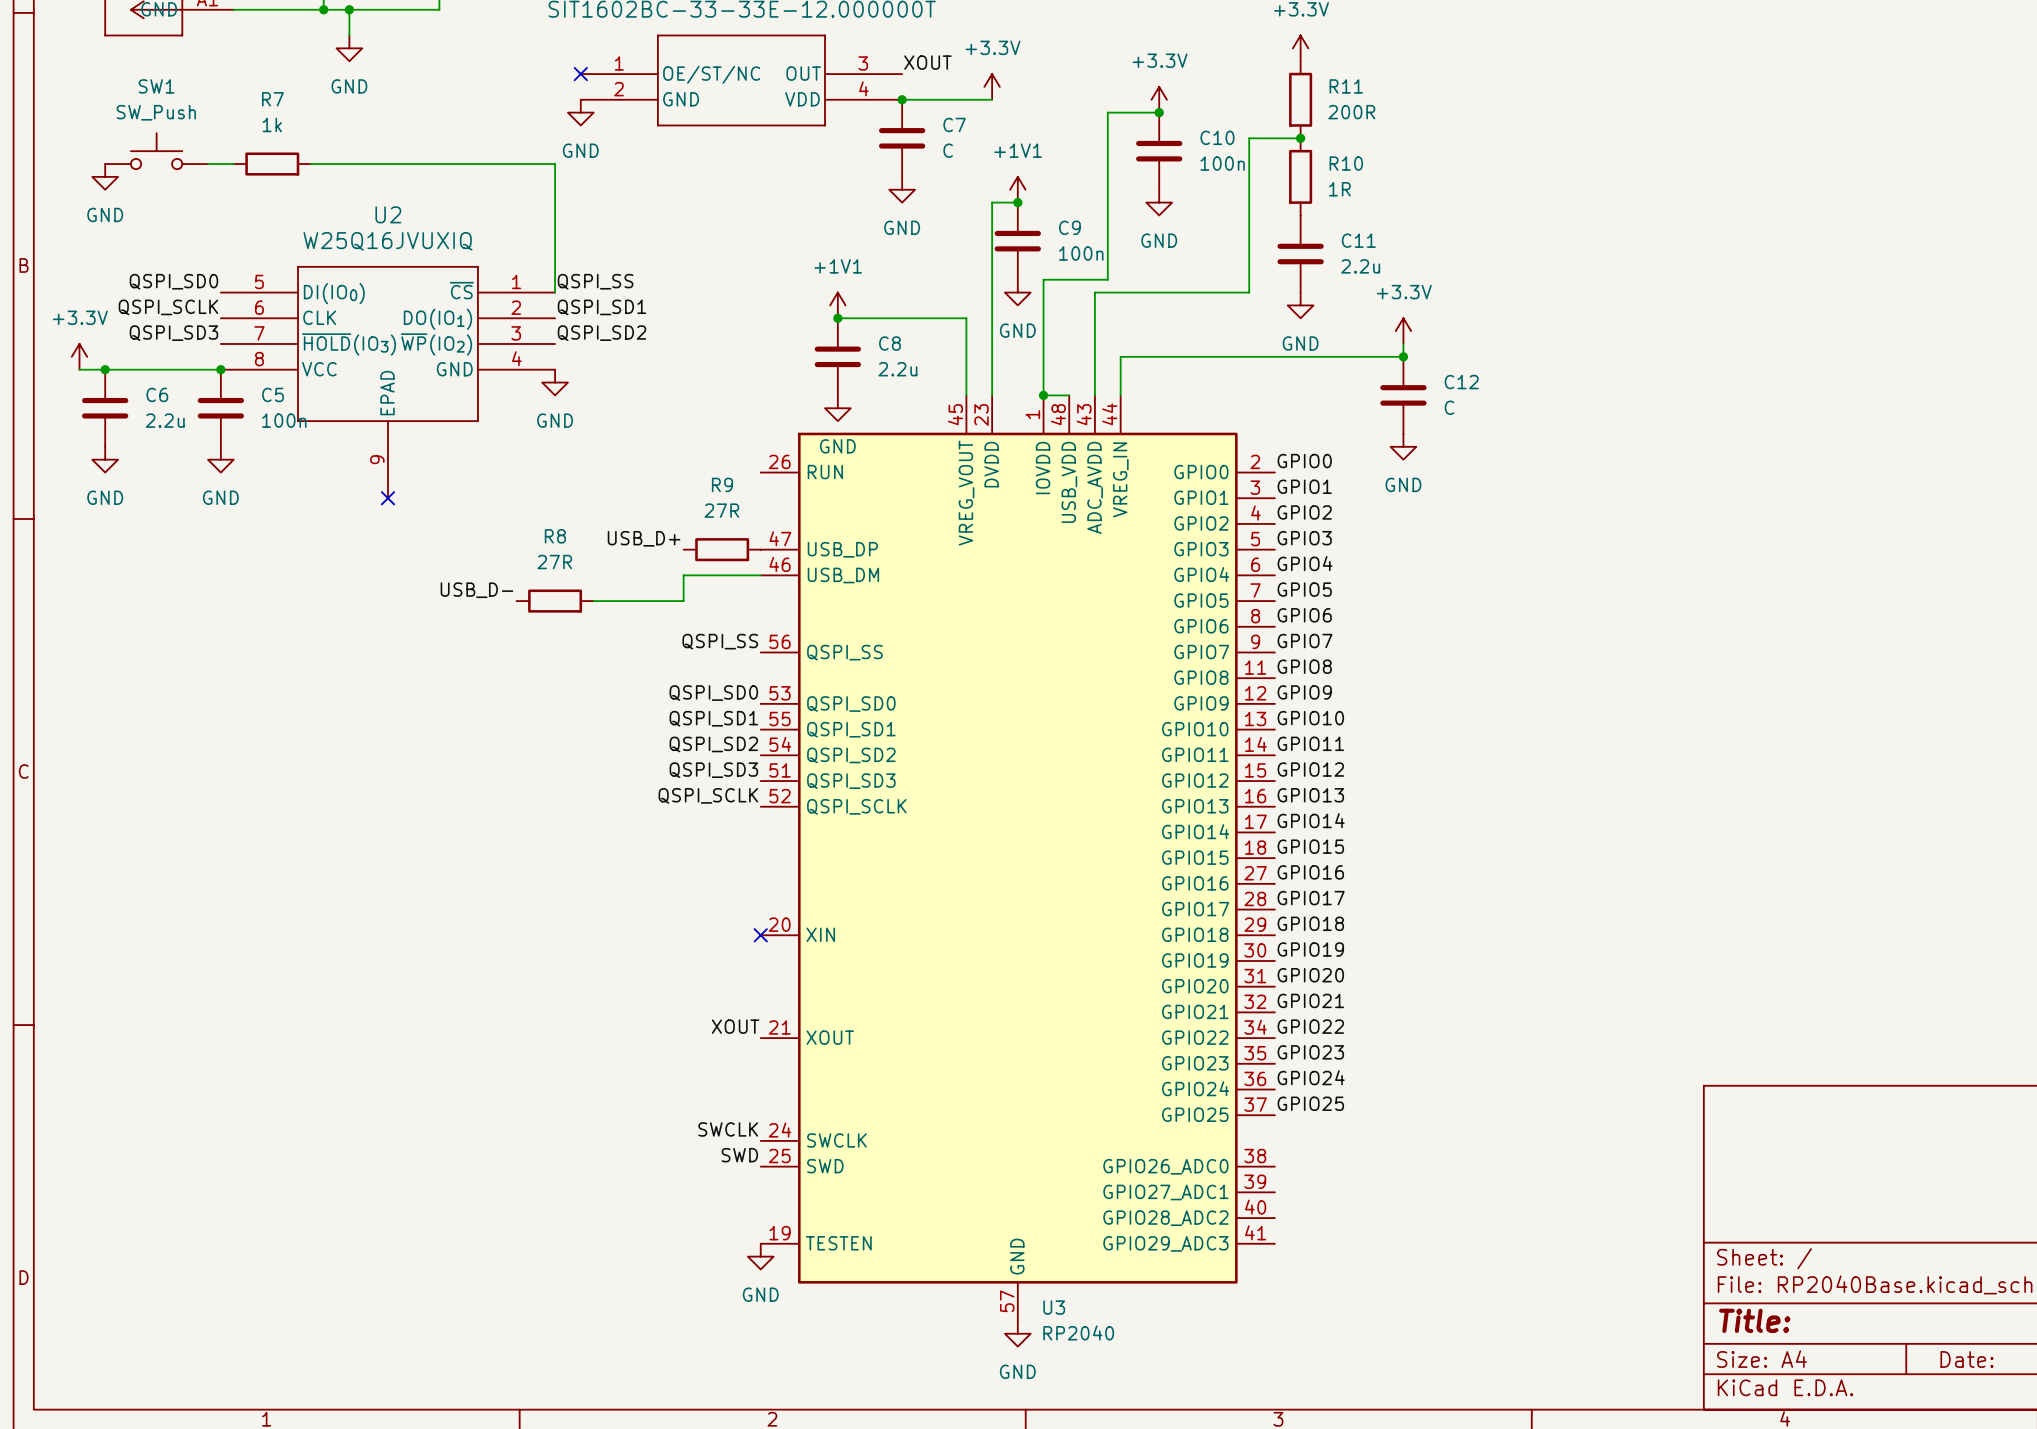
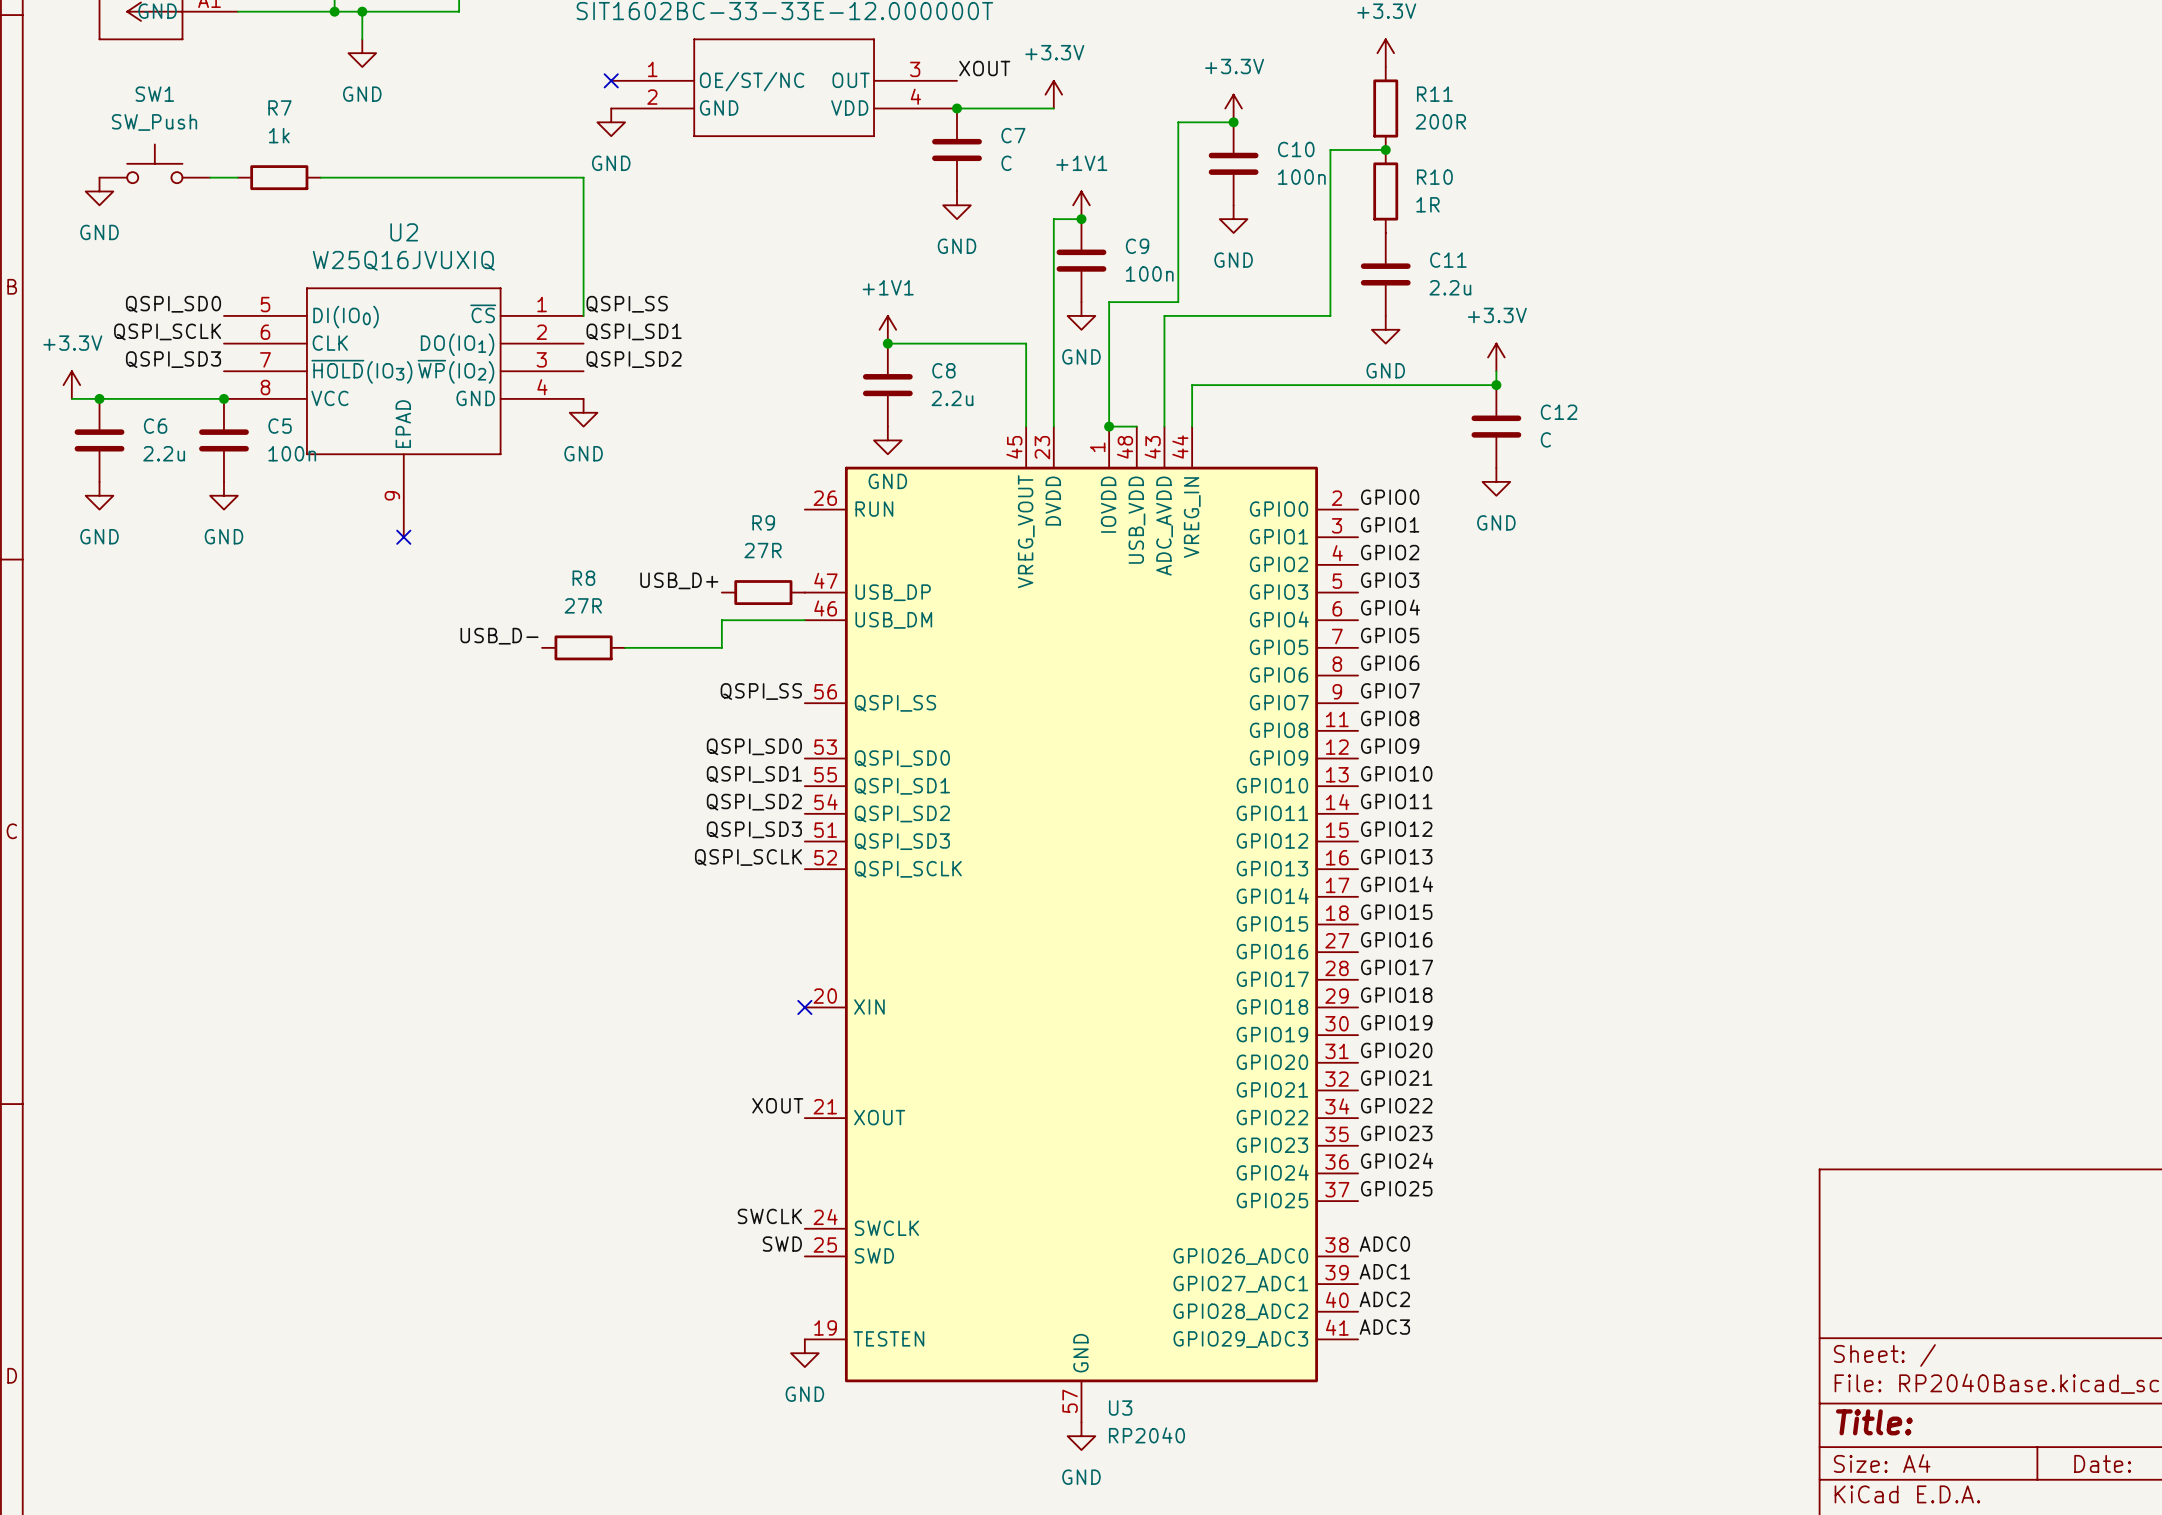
label: none -> ADC0 (1384, 1244)
label: none -> ADC1 (1384, 1271)
label: none -> ADC2 (1384, 1299)
label: none -> ADC3 (1384, 1327)

